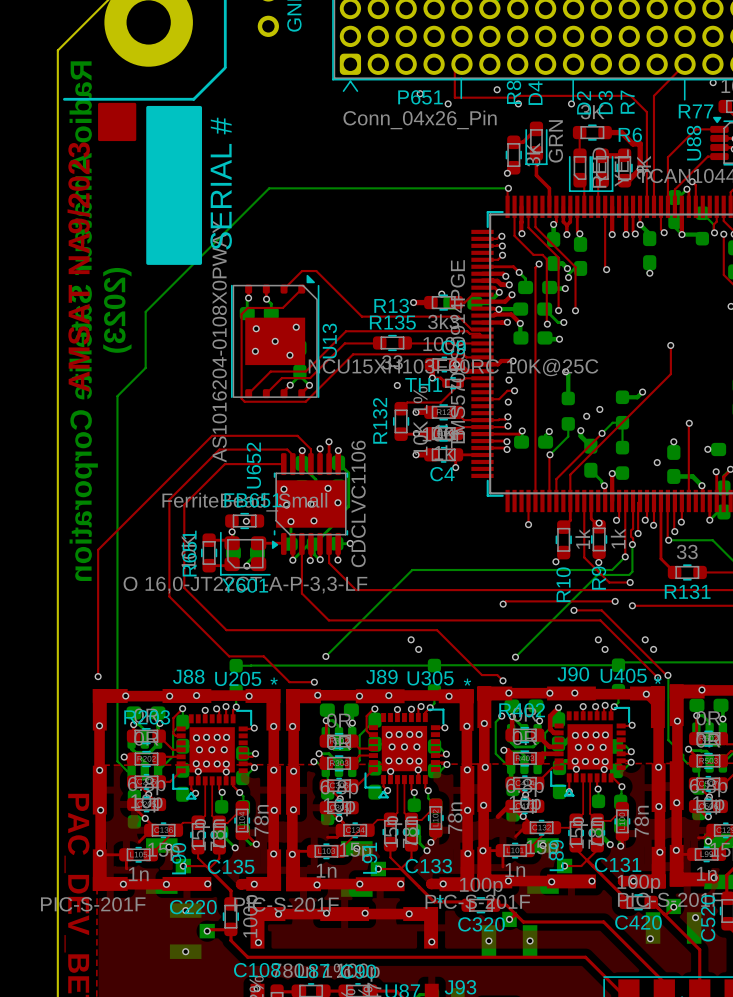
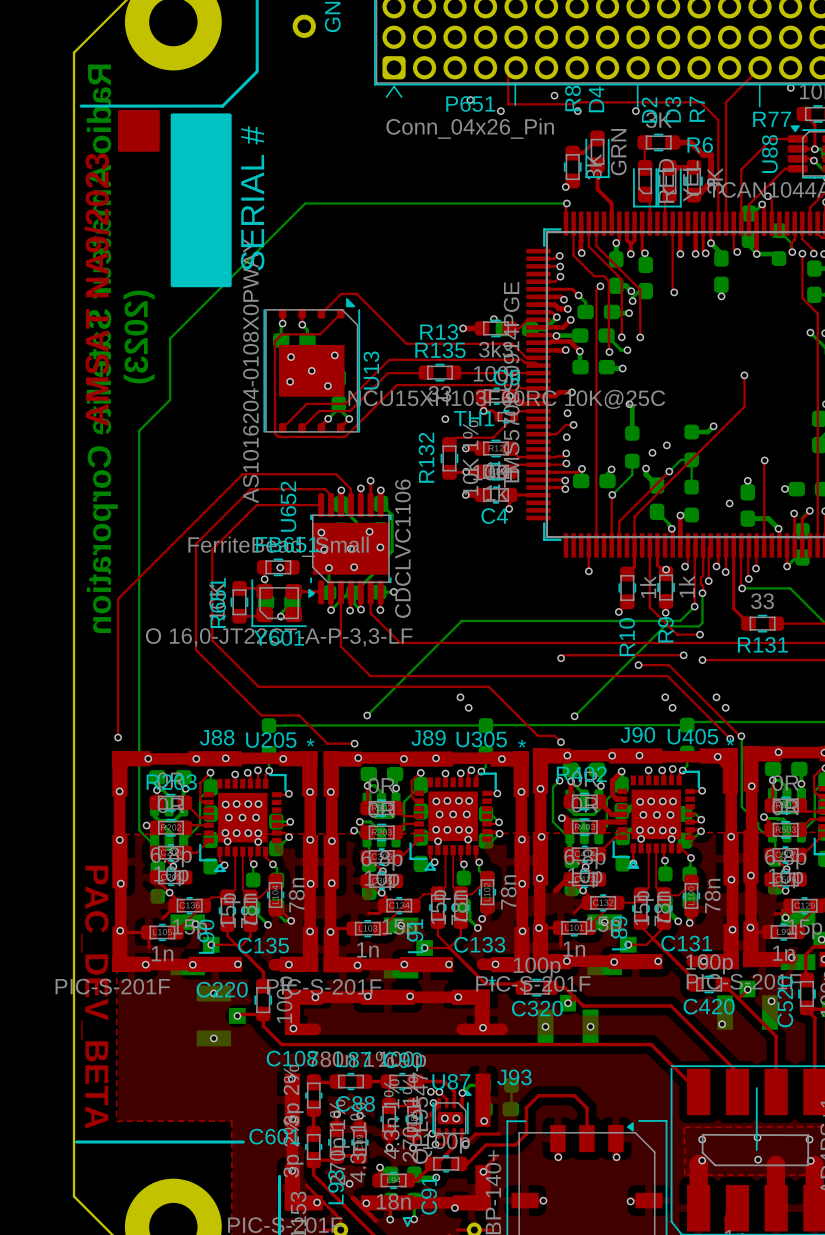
top track: none -> (483, 1027) (502, 1029)
top track: none -> (293, 1028) (315, 1029)
top track: none -> (462, 1029) (481, 1029)

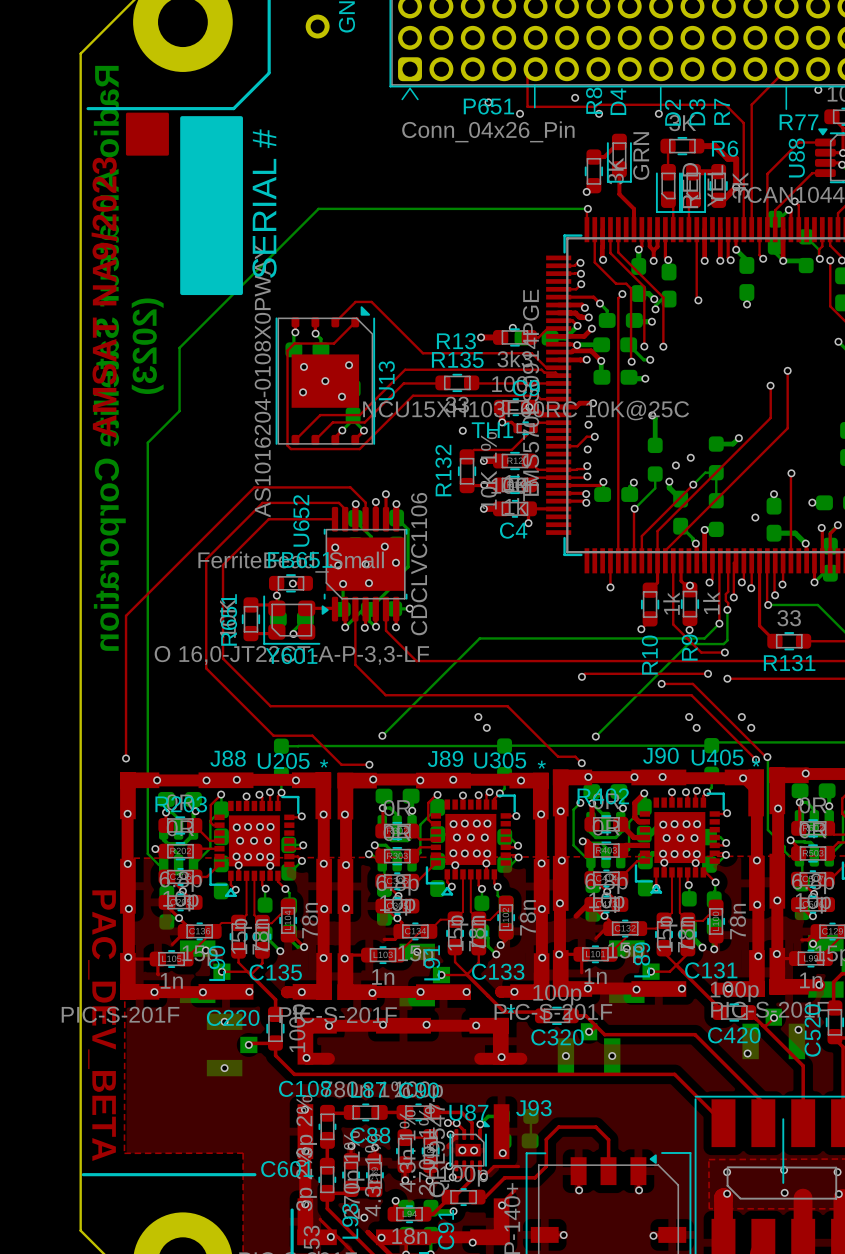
top track: none -> (787, 370) (787, 428) (665, 550) (665, 560)
via: none -> (787, 370)

